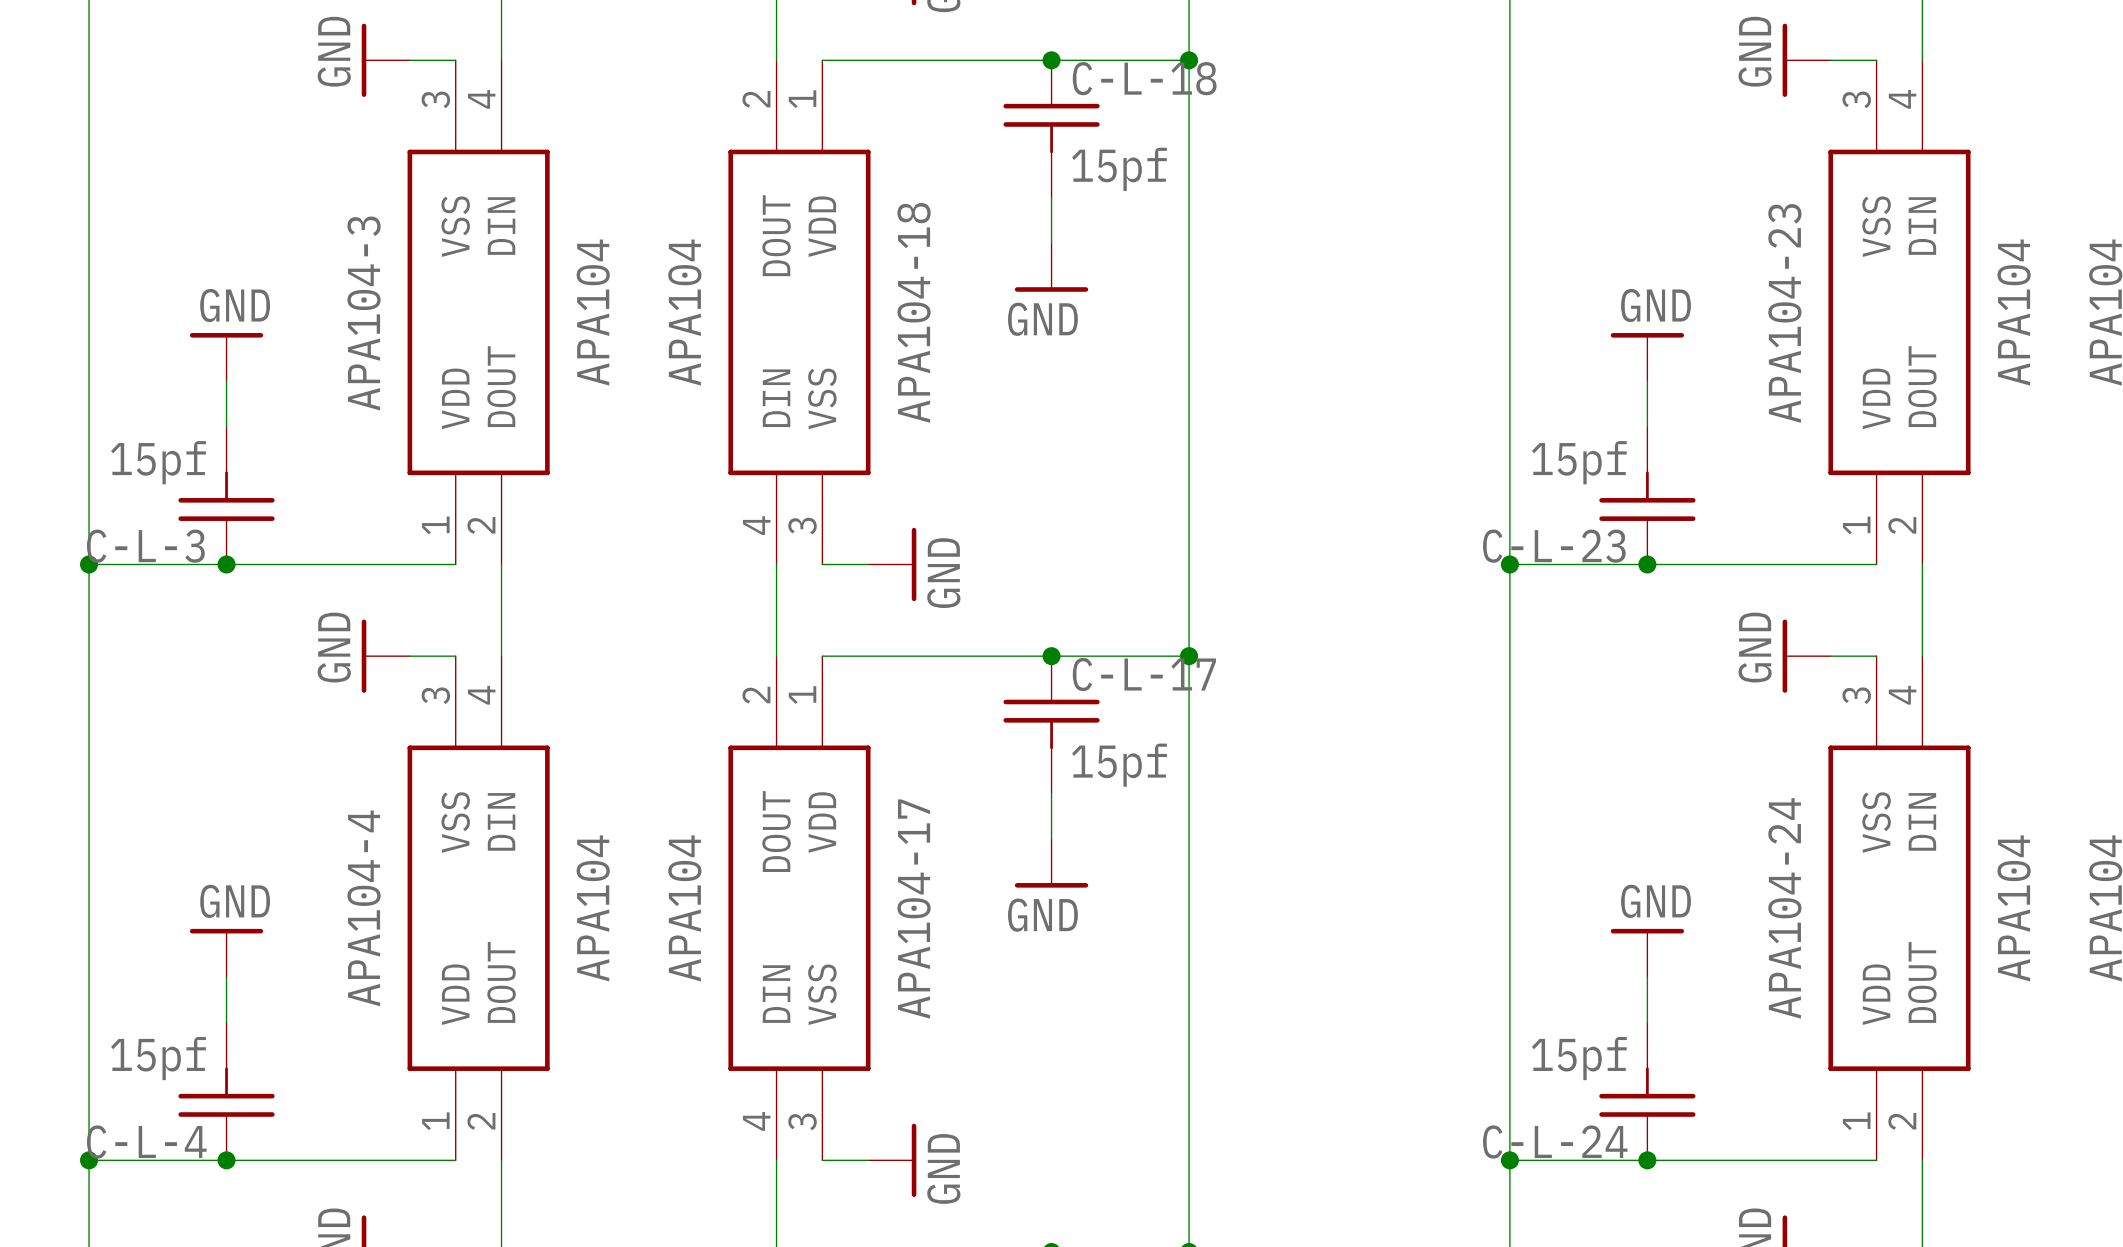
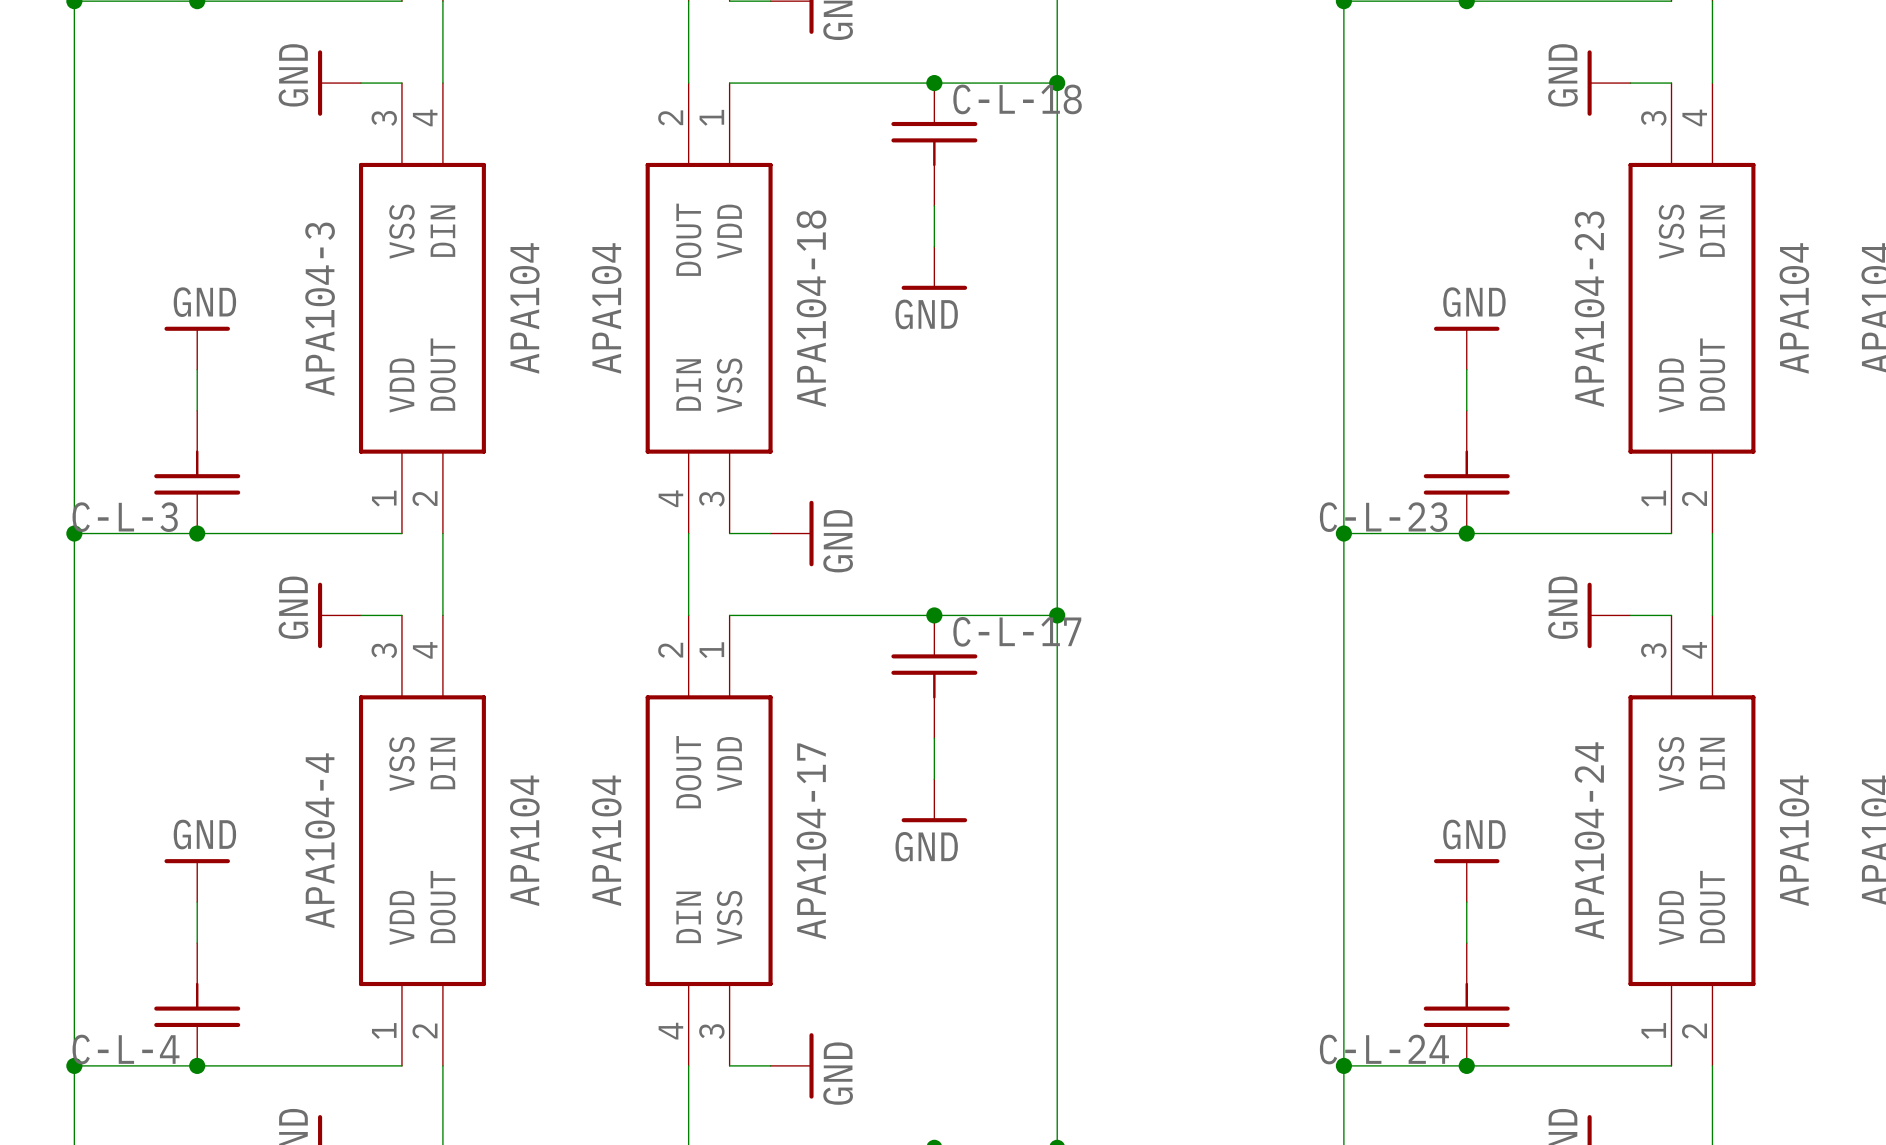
C-L-18 value: 15pf (1119, 169) -> none
C-L-3 value: 15pf (158, 462) -> none
C-L-23 value: 15pf (1579, 462) -> none
C-L-17 value: 15pf (1119, 765) -> none
C-L-4 value: 15pf (158, 1058) -> none
C-L-24 value: 15pf (1579, 1058) -> none

